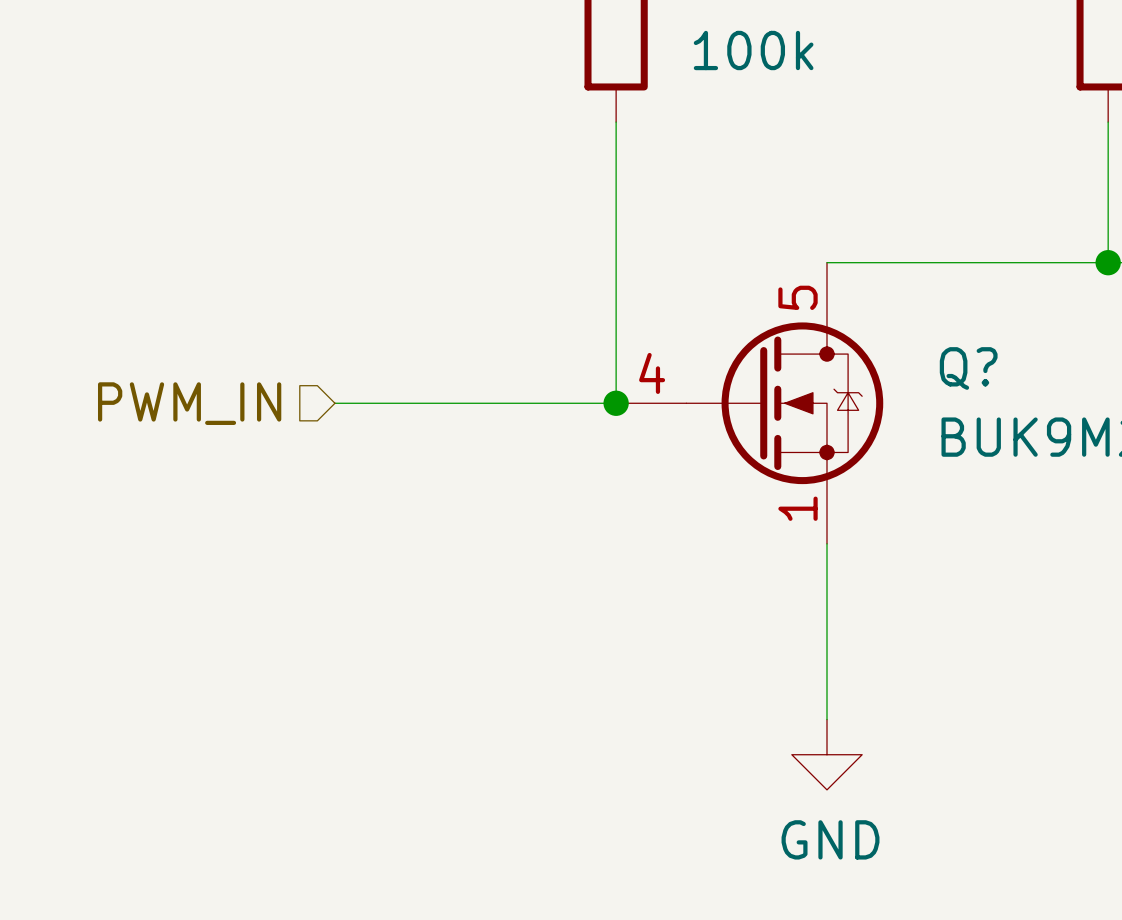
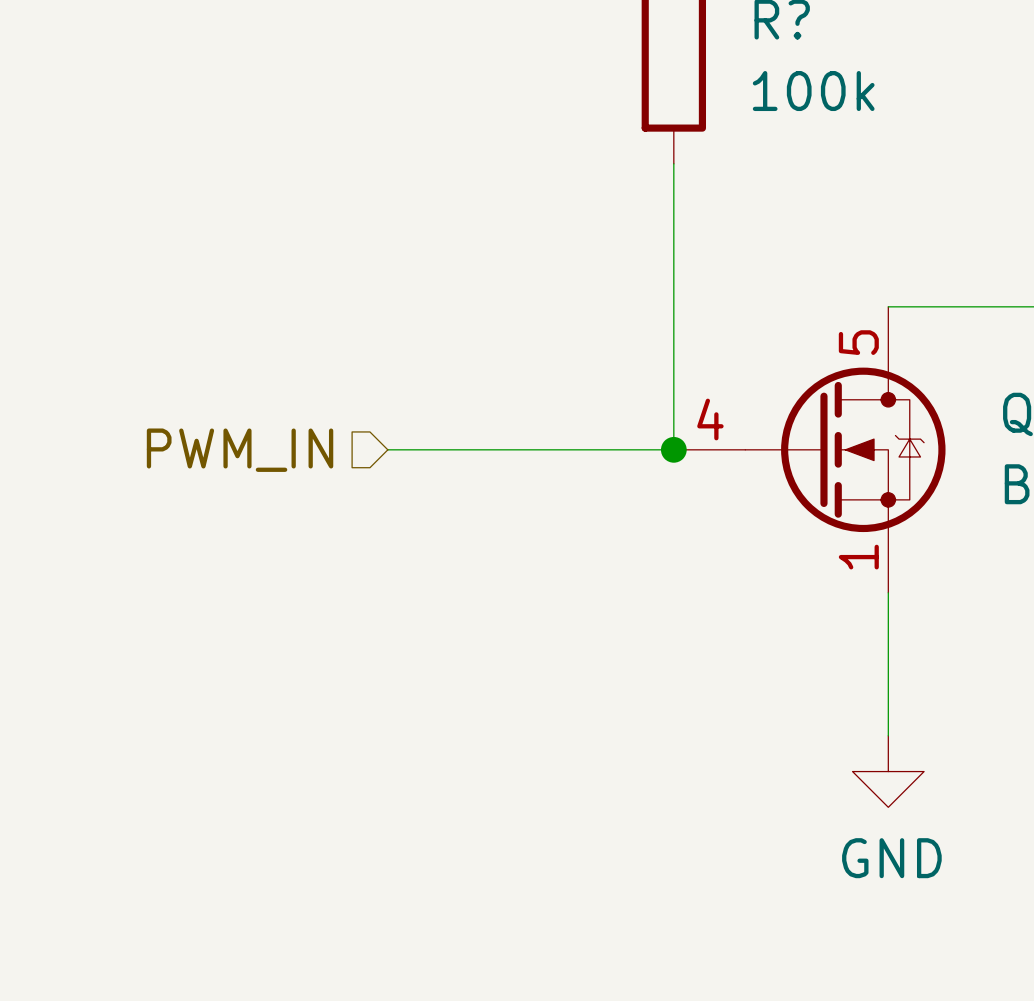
power symbol position: GND (826, 754) -> GND (888, 771)

